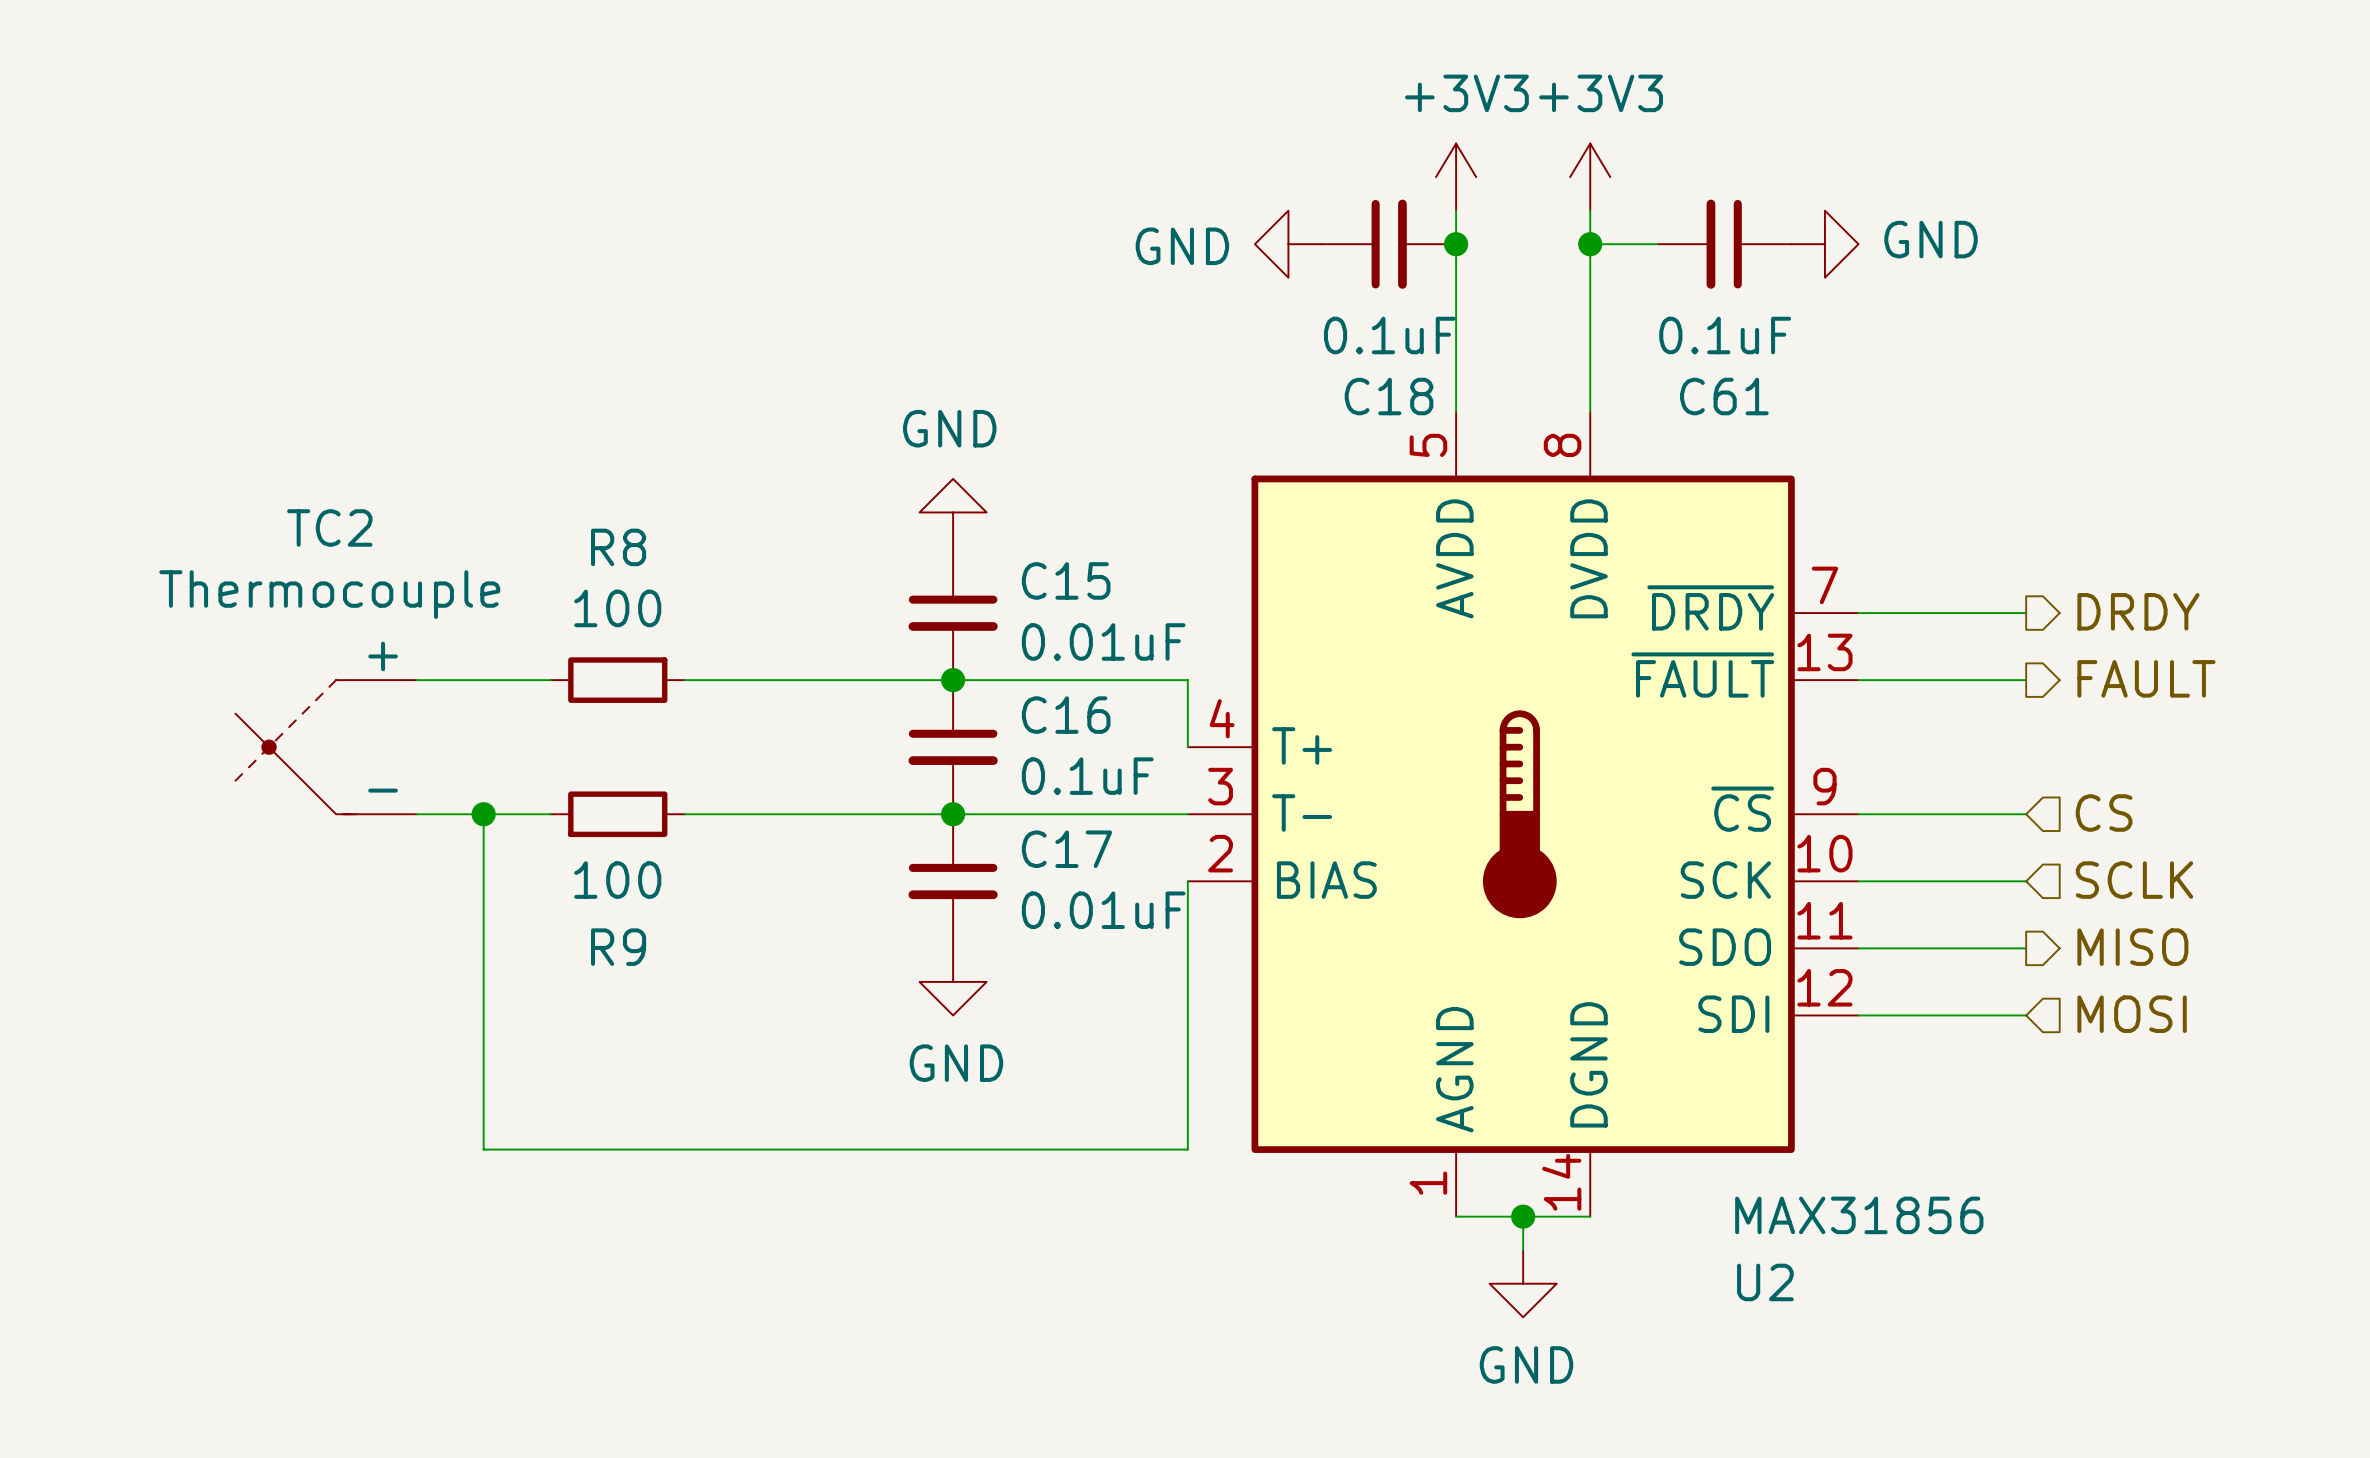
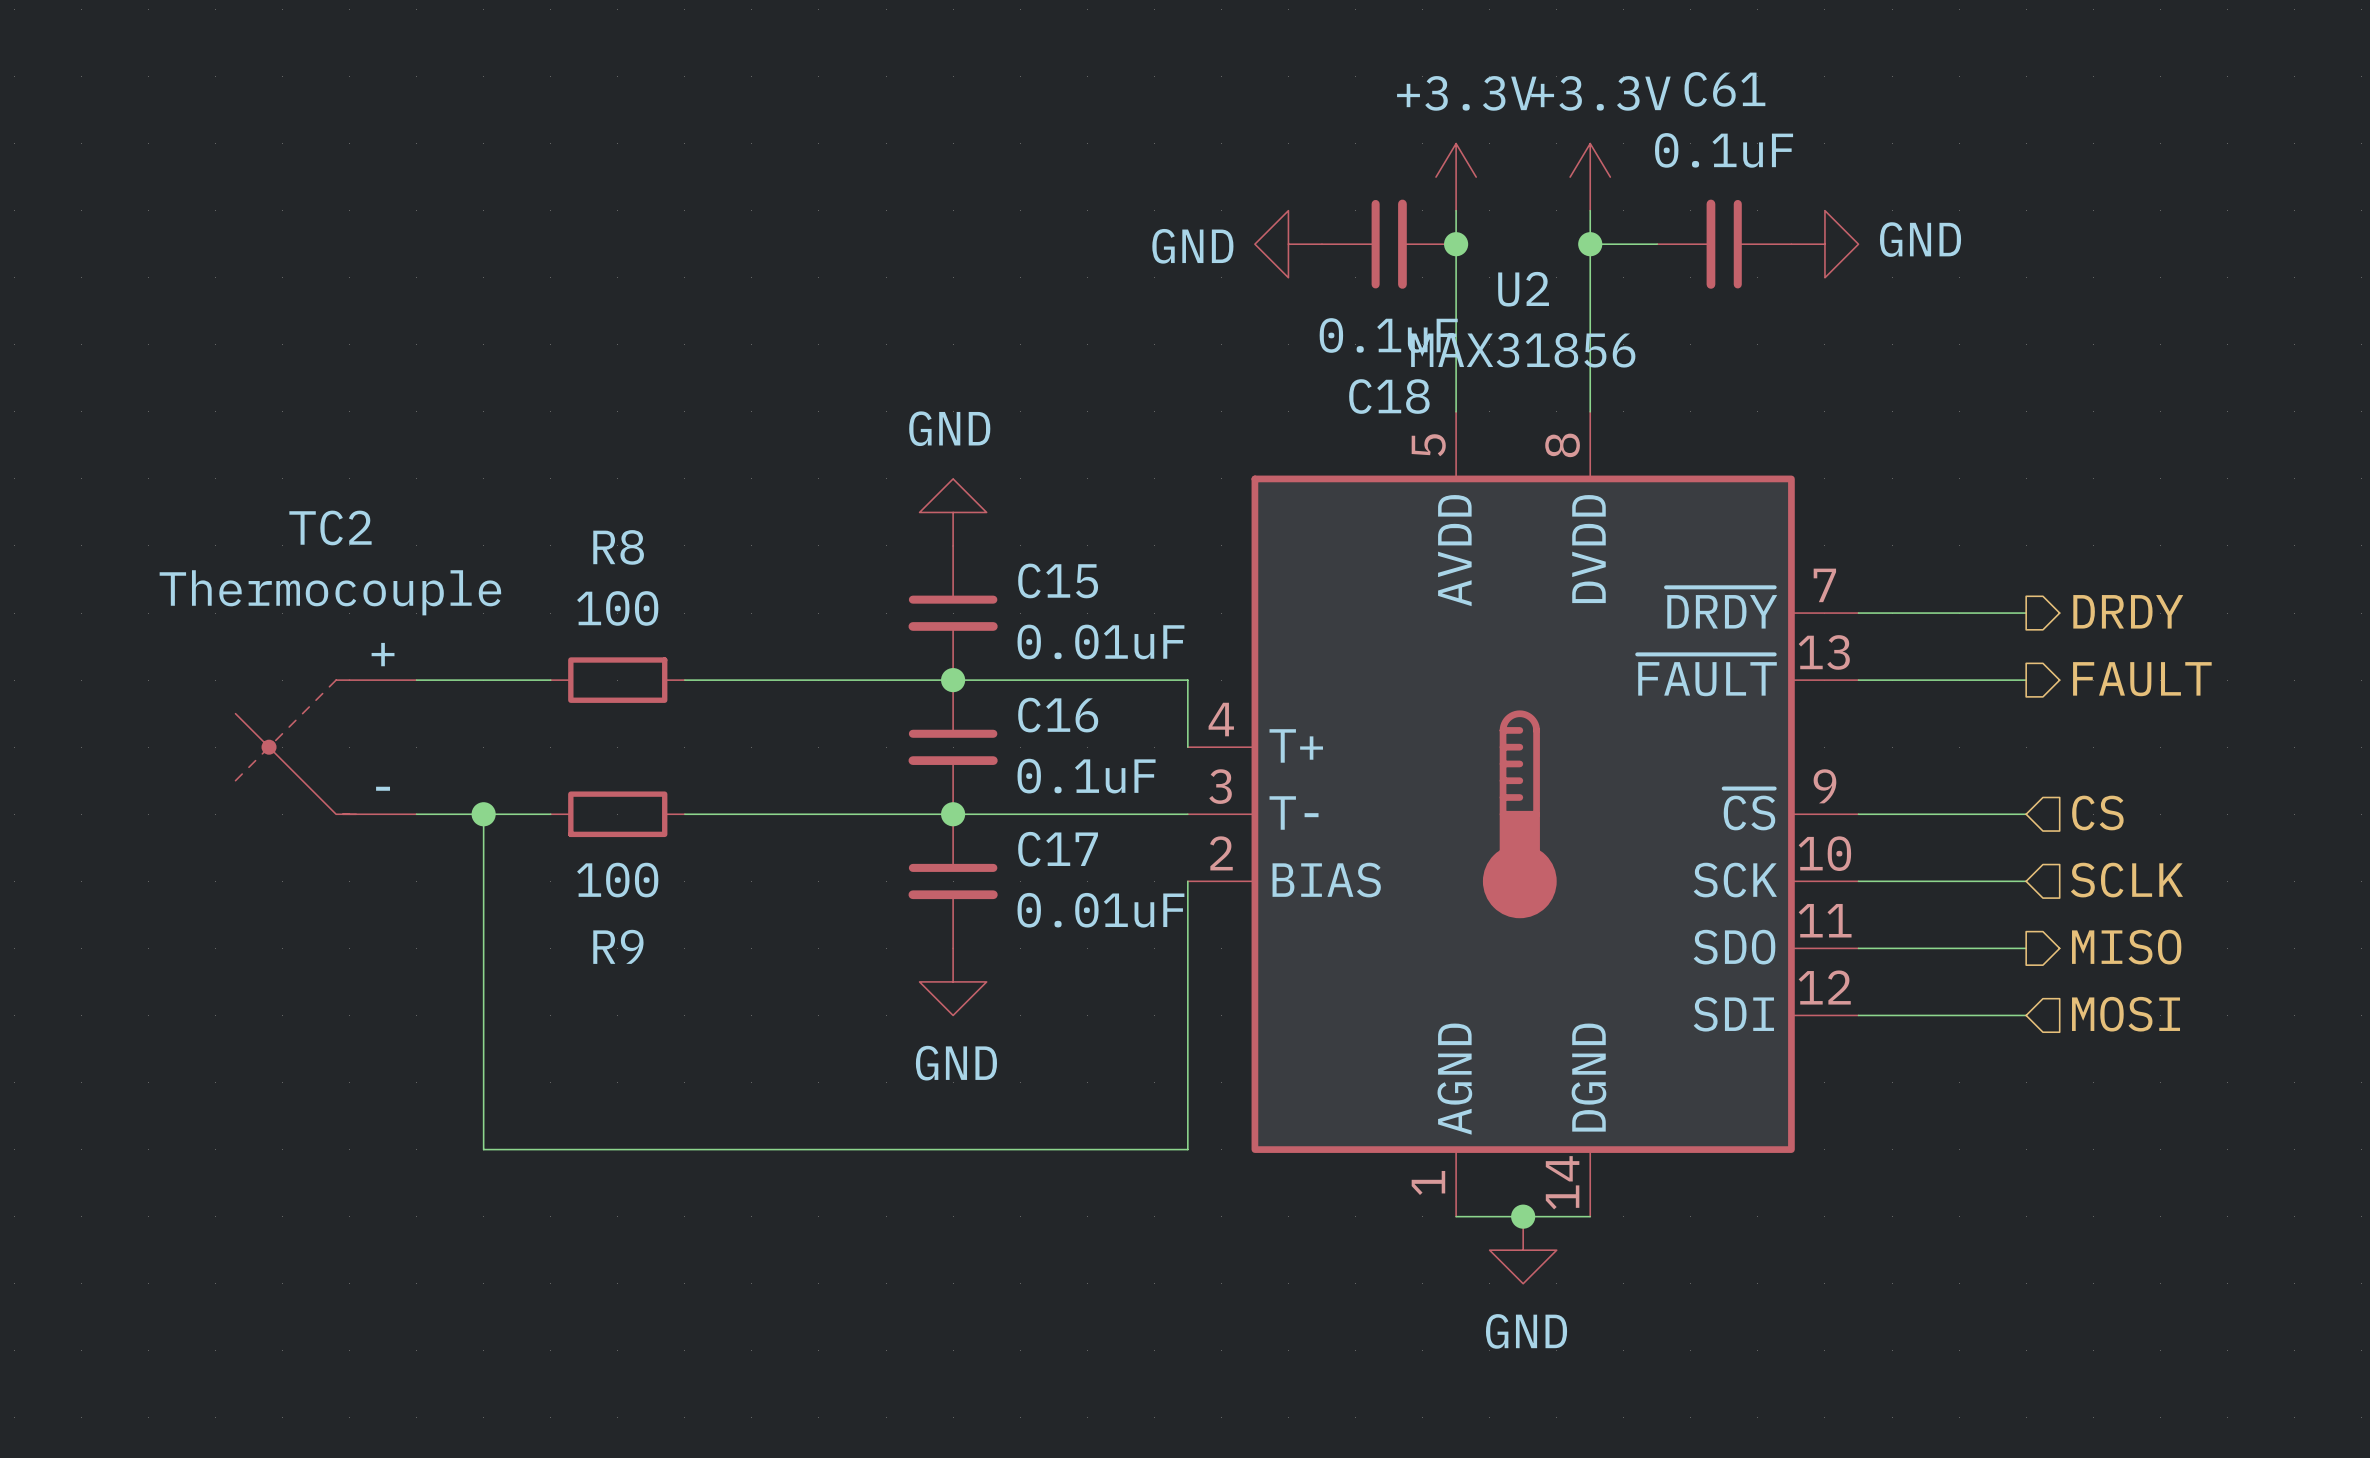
power symbol: +3V3 (1456, 177) -> +3.3V (1456, 177)
power symbol: +3V3 (1590, 177) -> +3.3V (1590, 177)
C61 value position: 0.1uF (1725, 335) -> 0.1uF (1724, 150)
C61 name position: C61 (1724, 396) -> C61 (1724, 89)
U2 value position: MAX31856 (1859, 1215) -> MAX31856 (1523, 350)
U2 name position: U2 (1765, 1282) -> U2 (1523, 289)
power symbol position: GND (1523, 1283) -> GND (1523, 1250)

